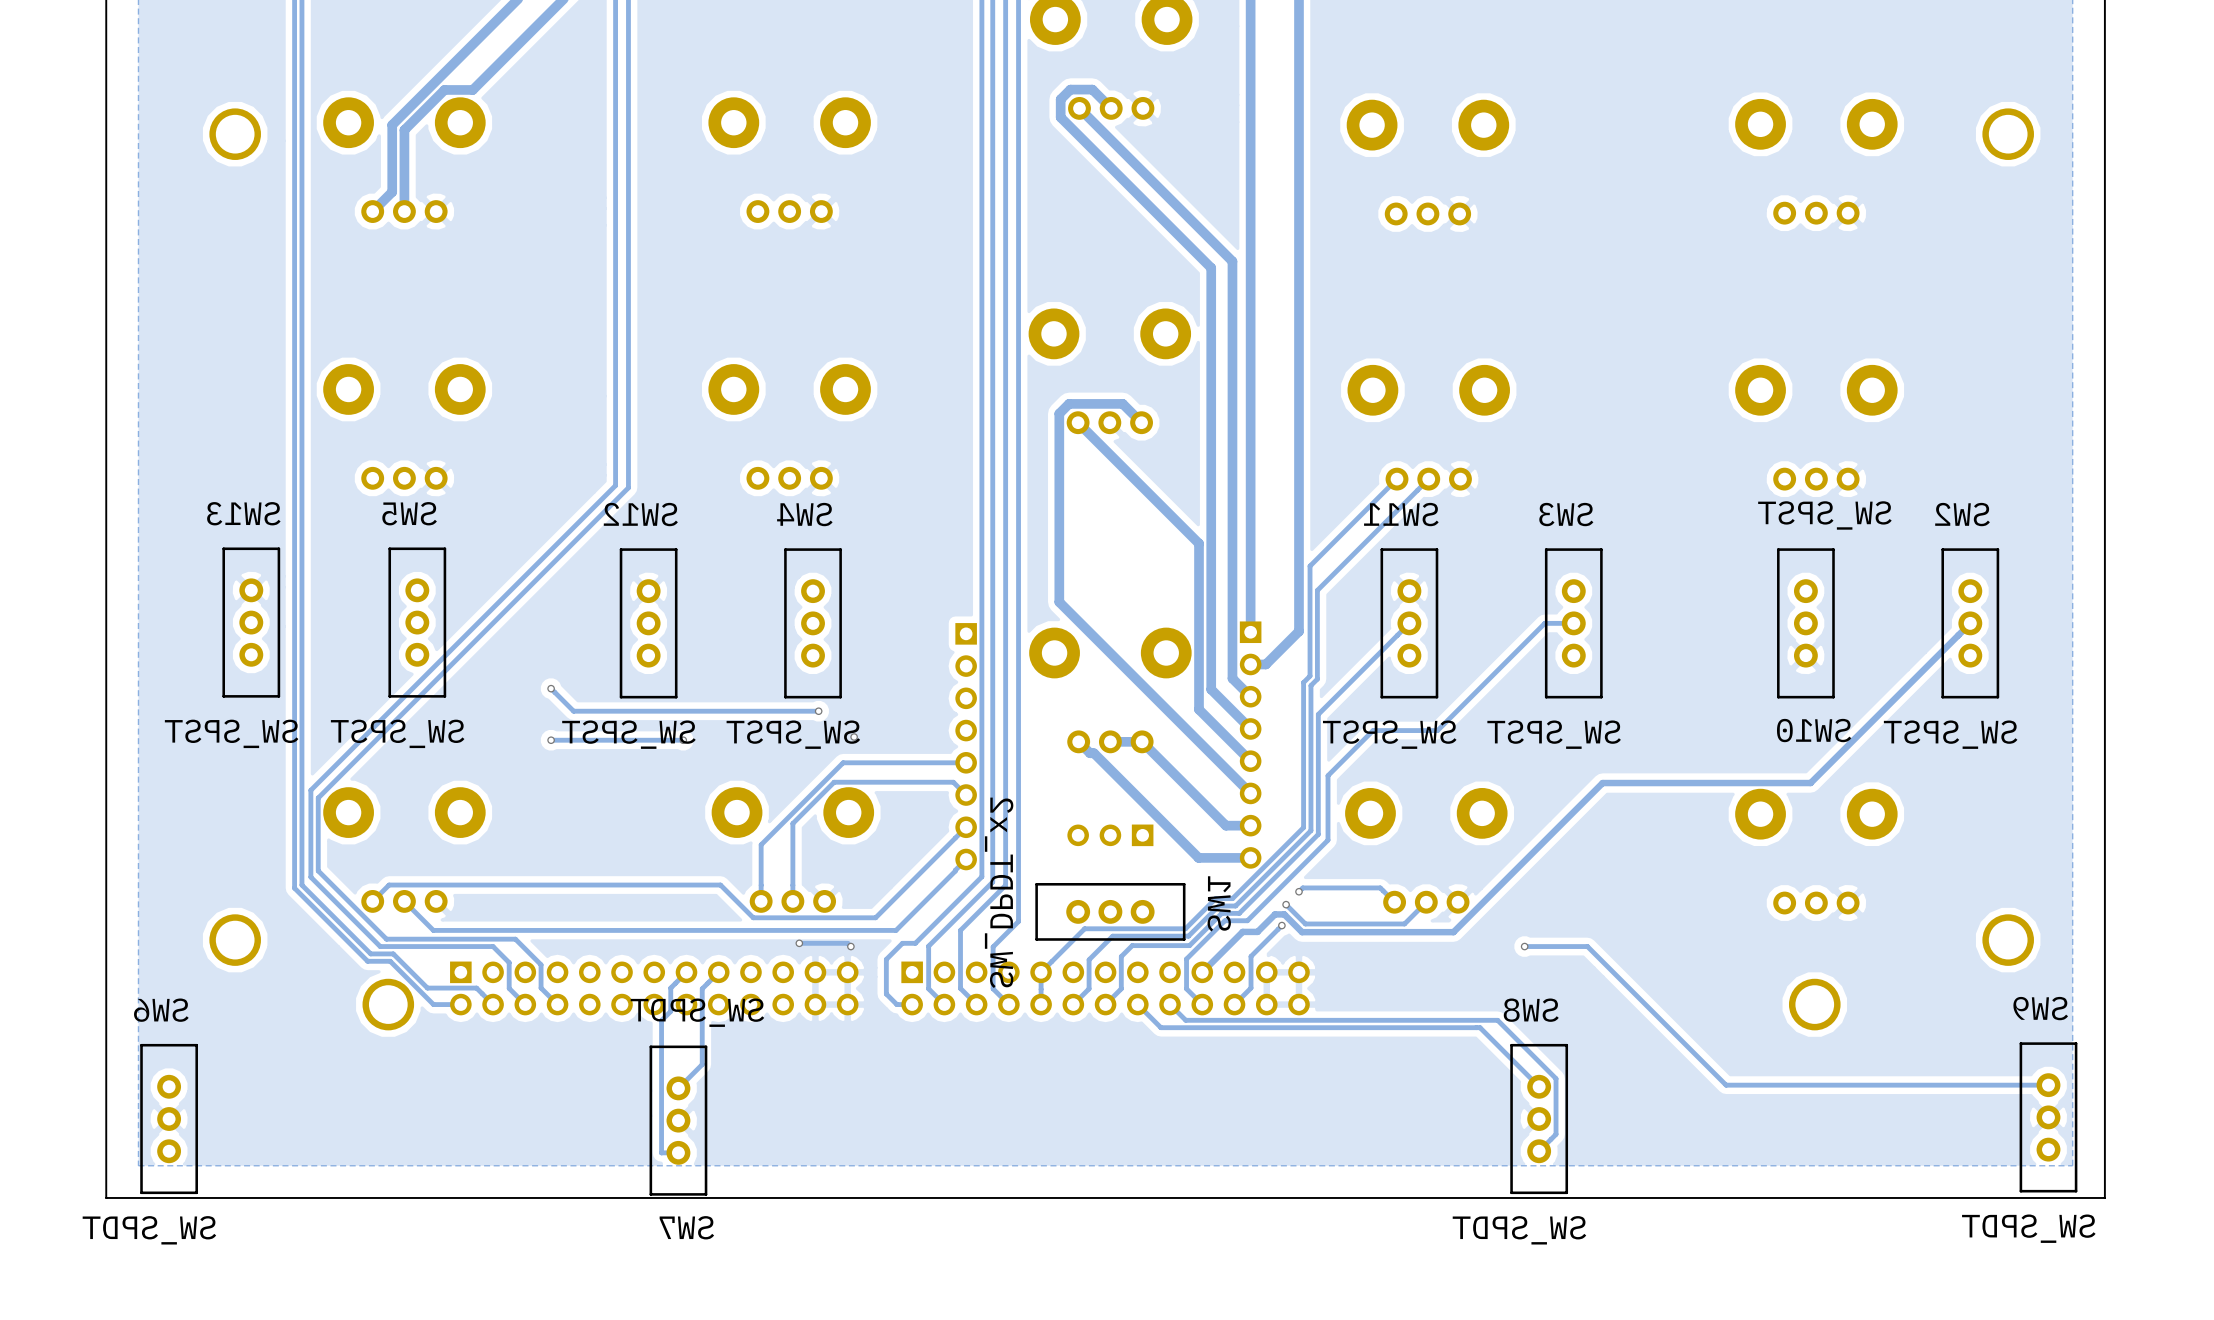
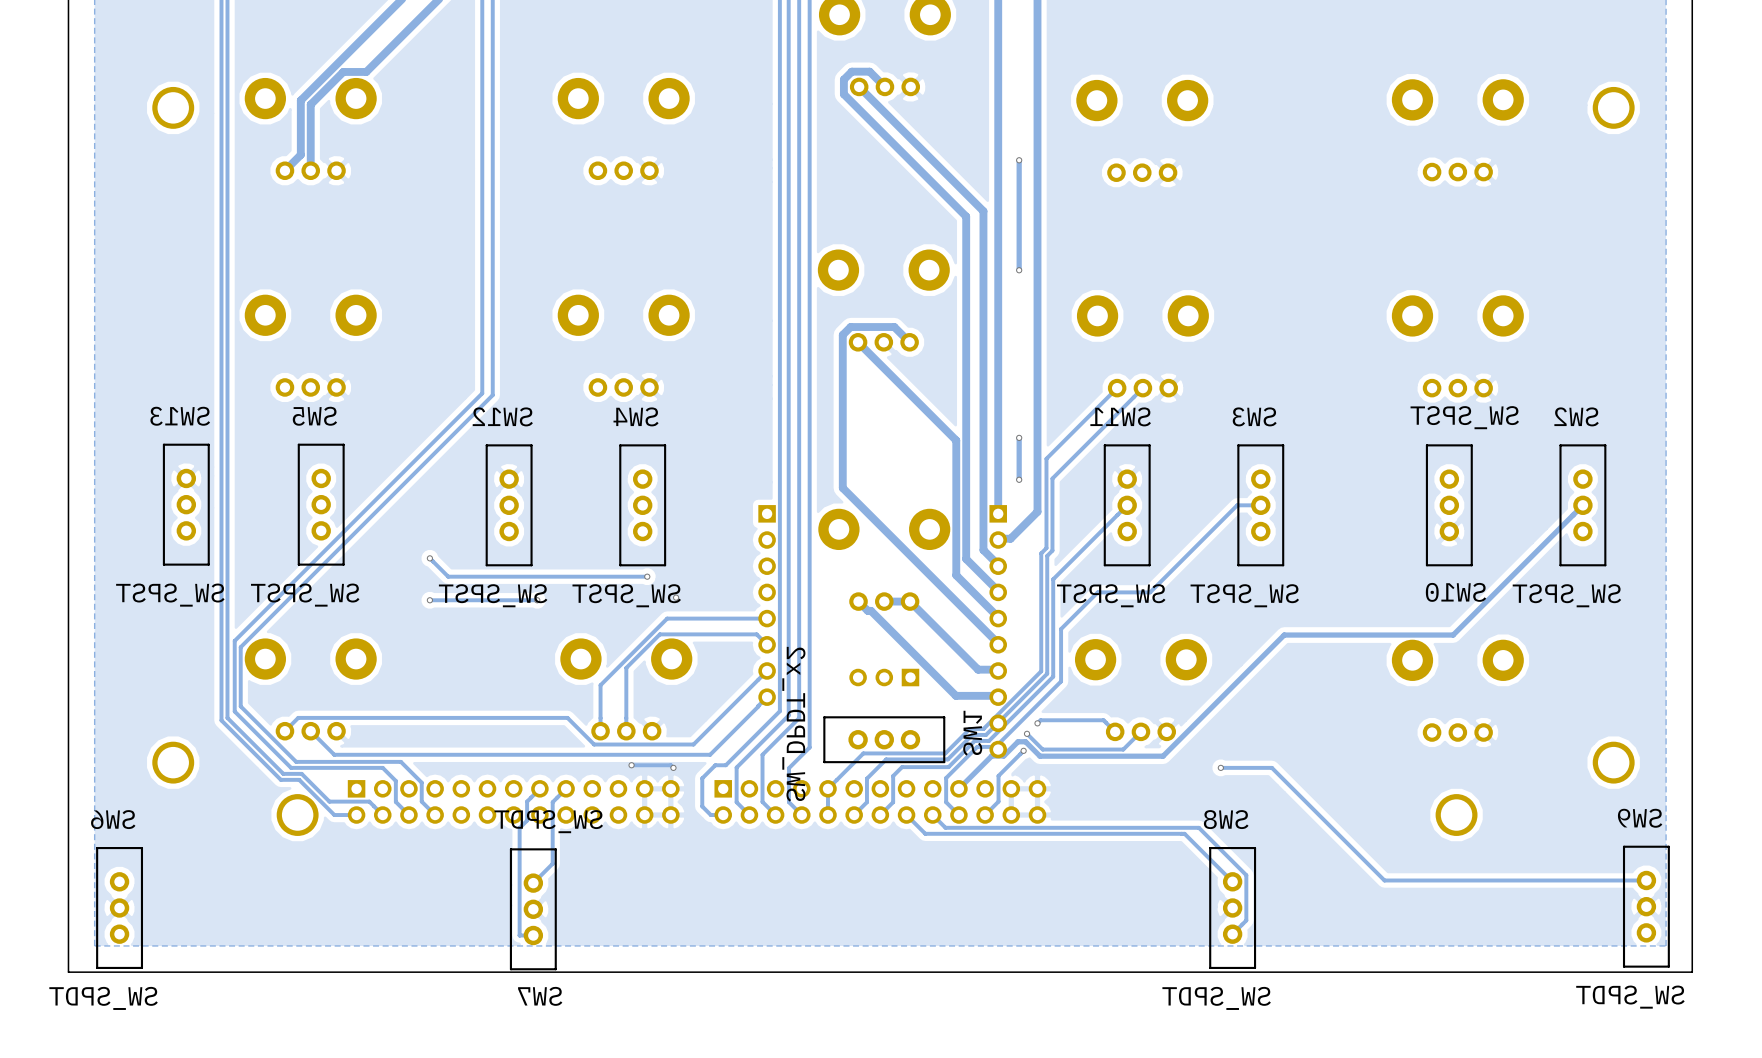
track: none -> (1019, 160) (1019, 270)
via: none -> (1019, 160)
via: none -> (1019, 270)
track: none -> (1019, 437) (1019, 479)
via: none -> (1019, 437)
via: none -> (1019, 479)
part: (1250, 745) -> none
part: none -> (998, 631)

